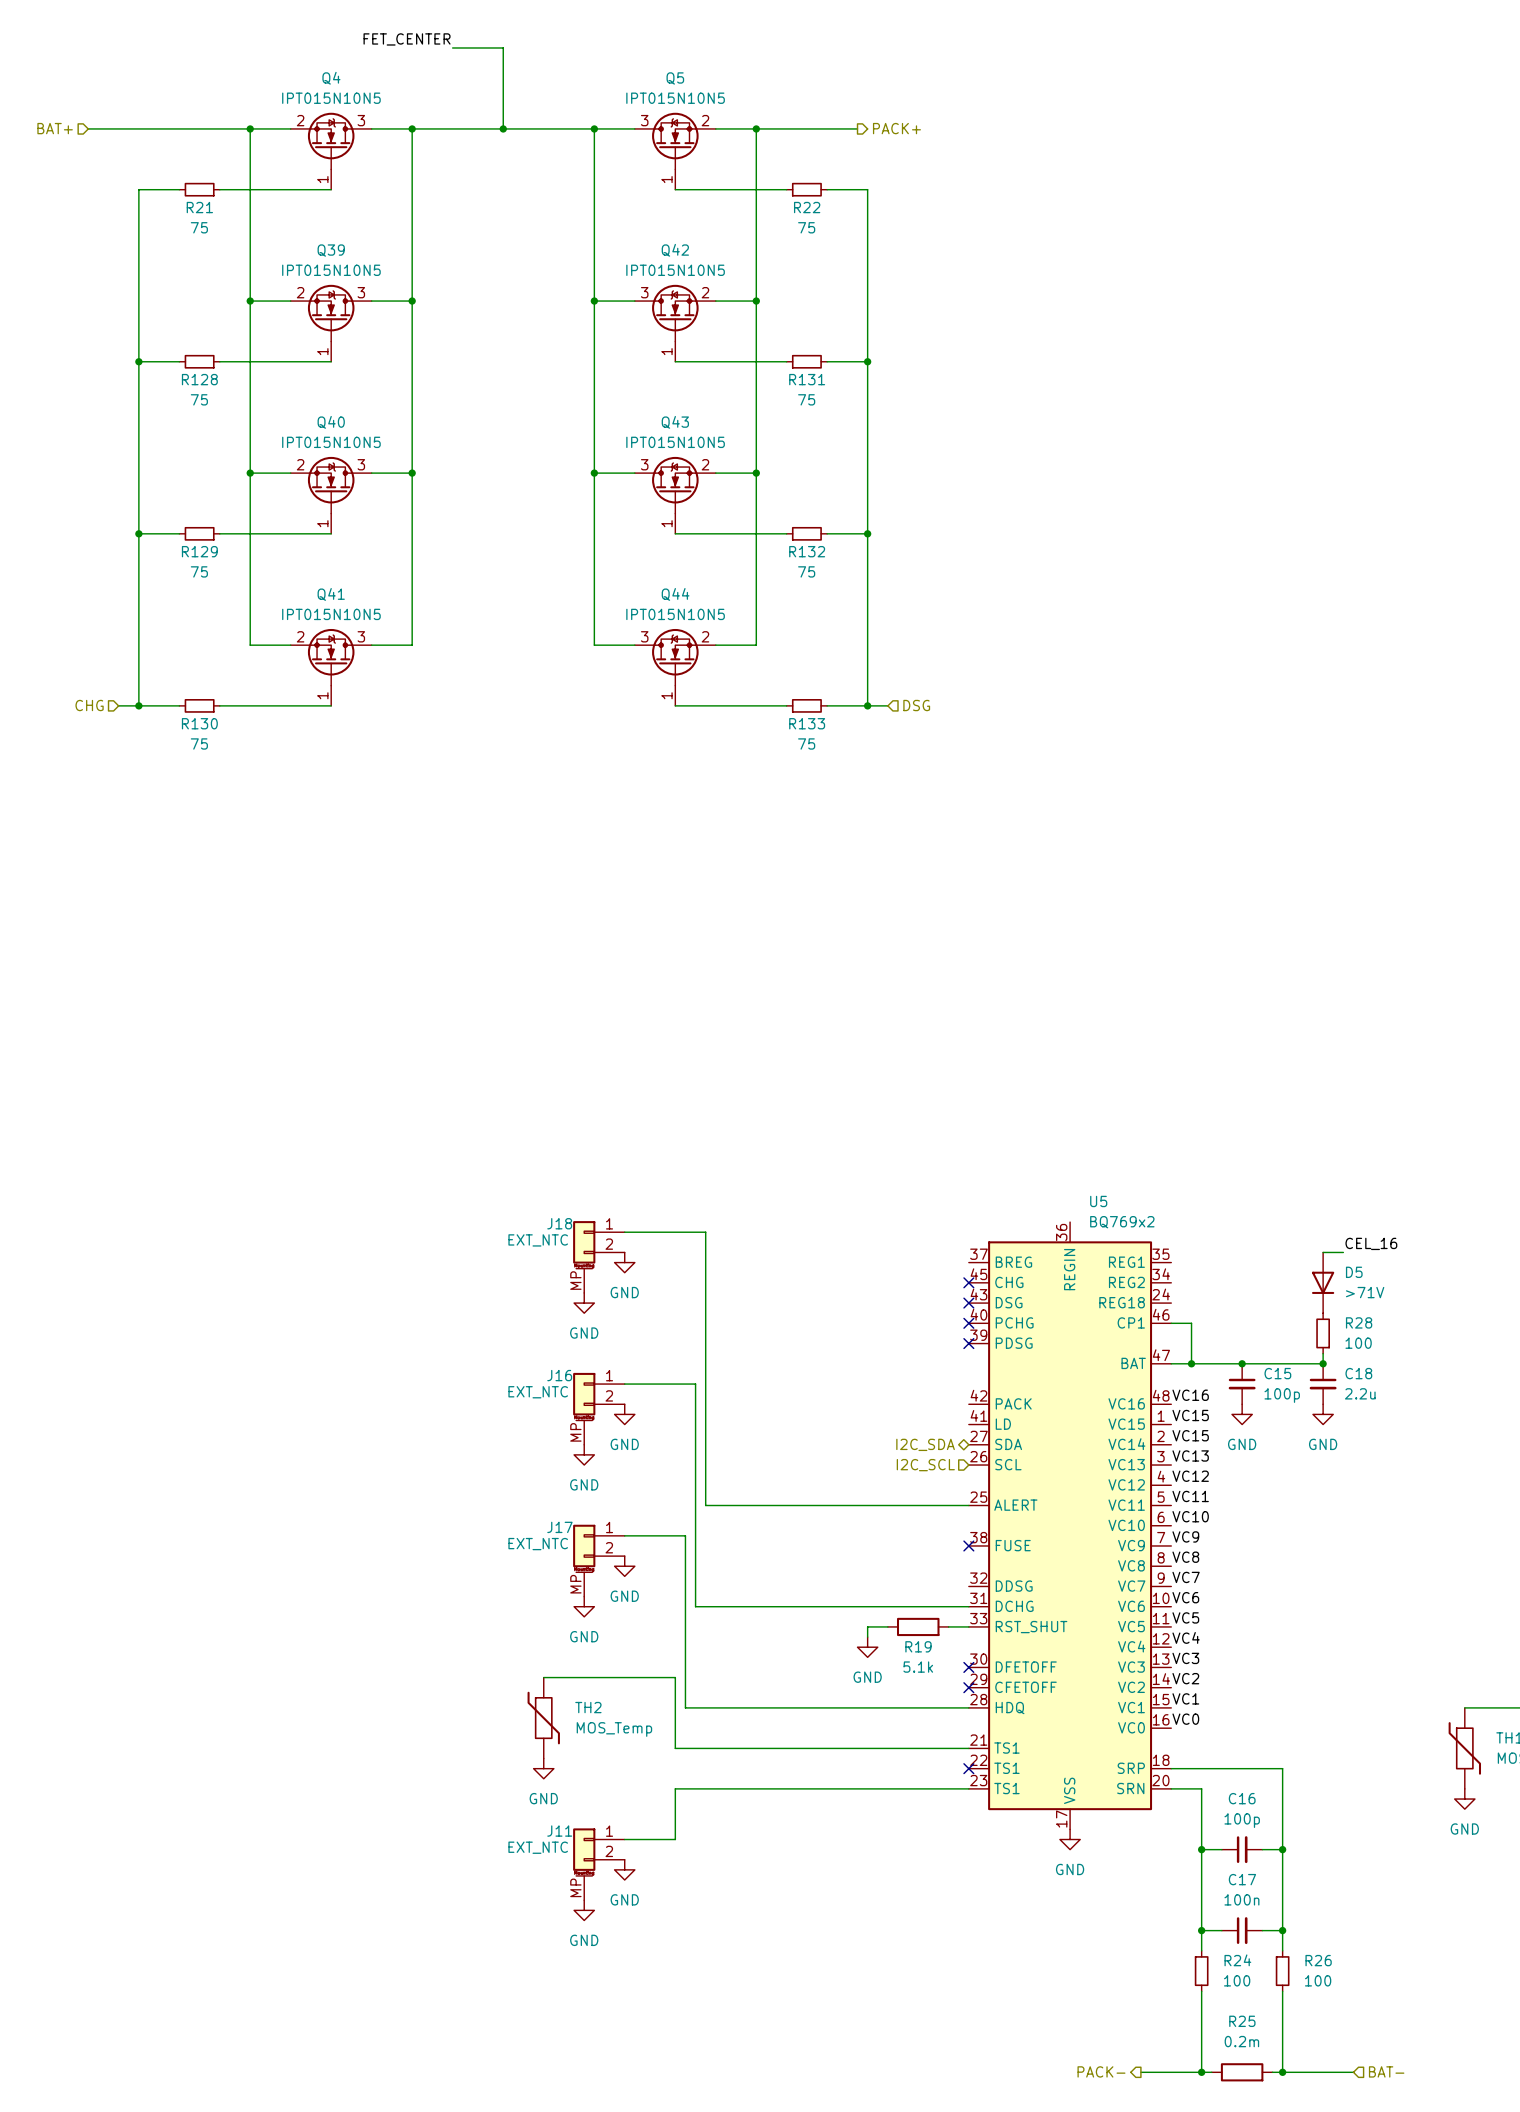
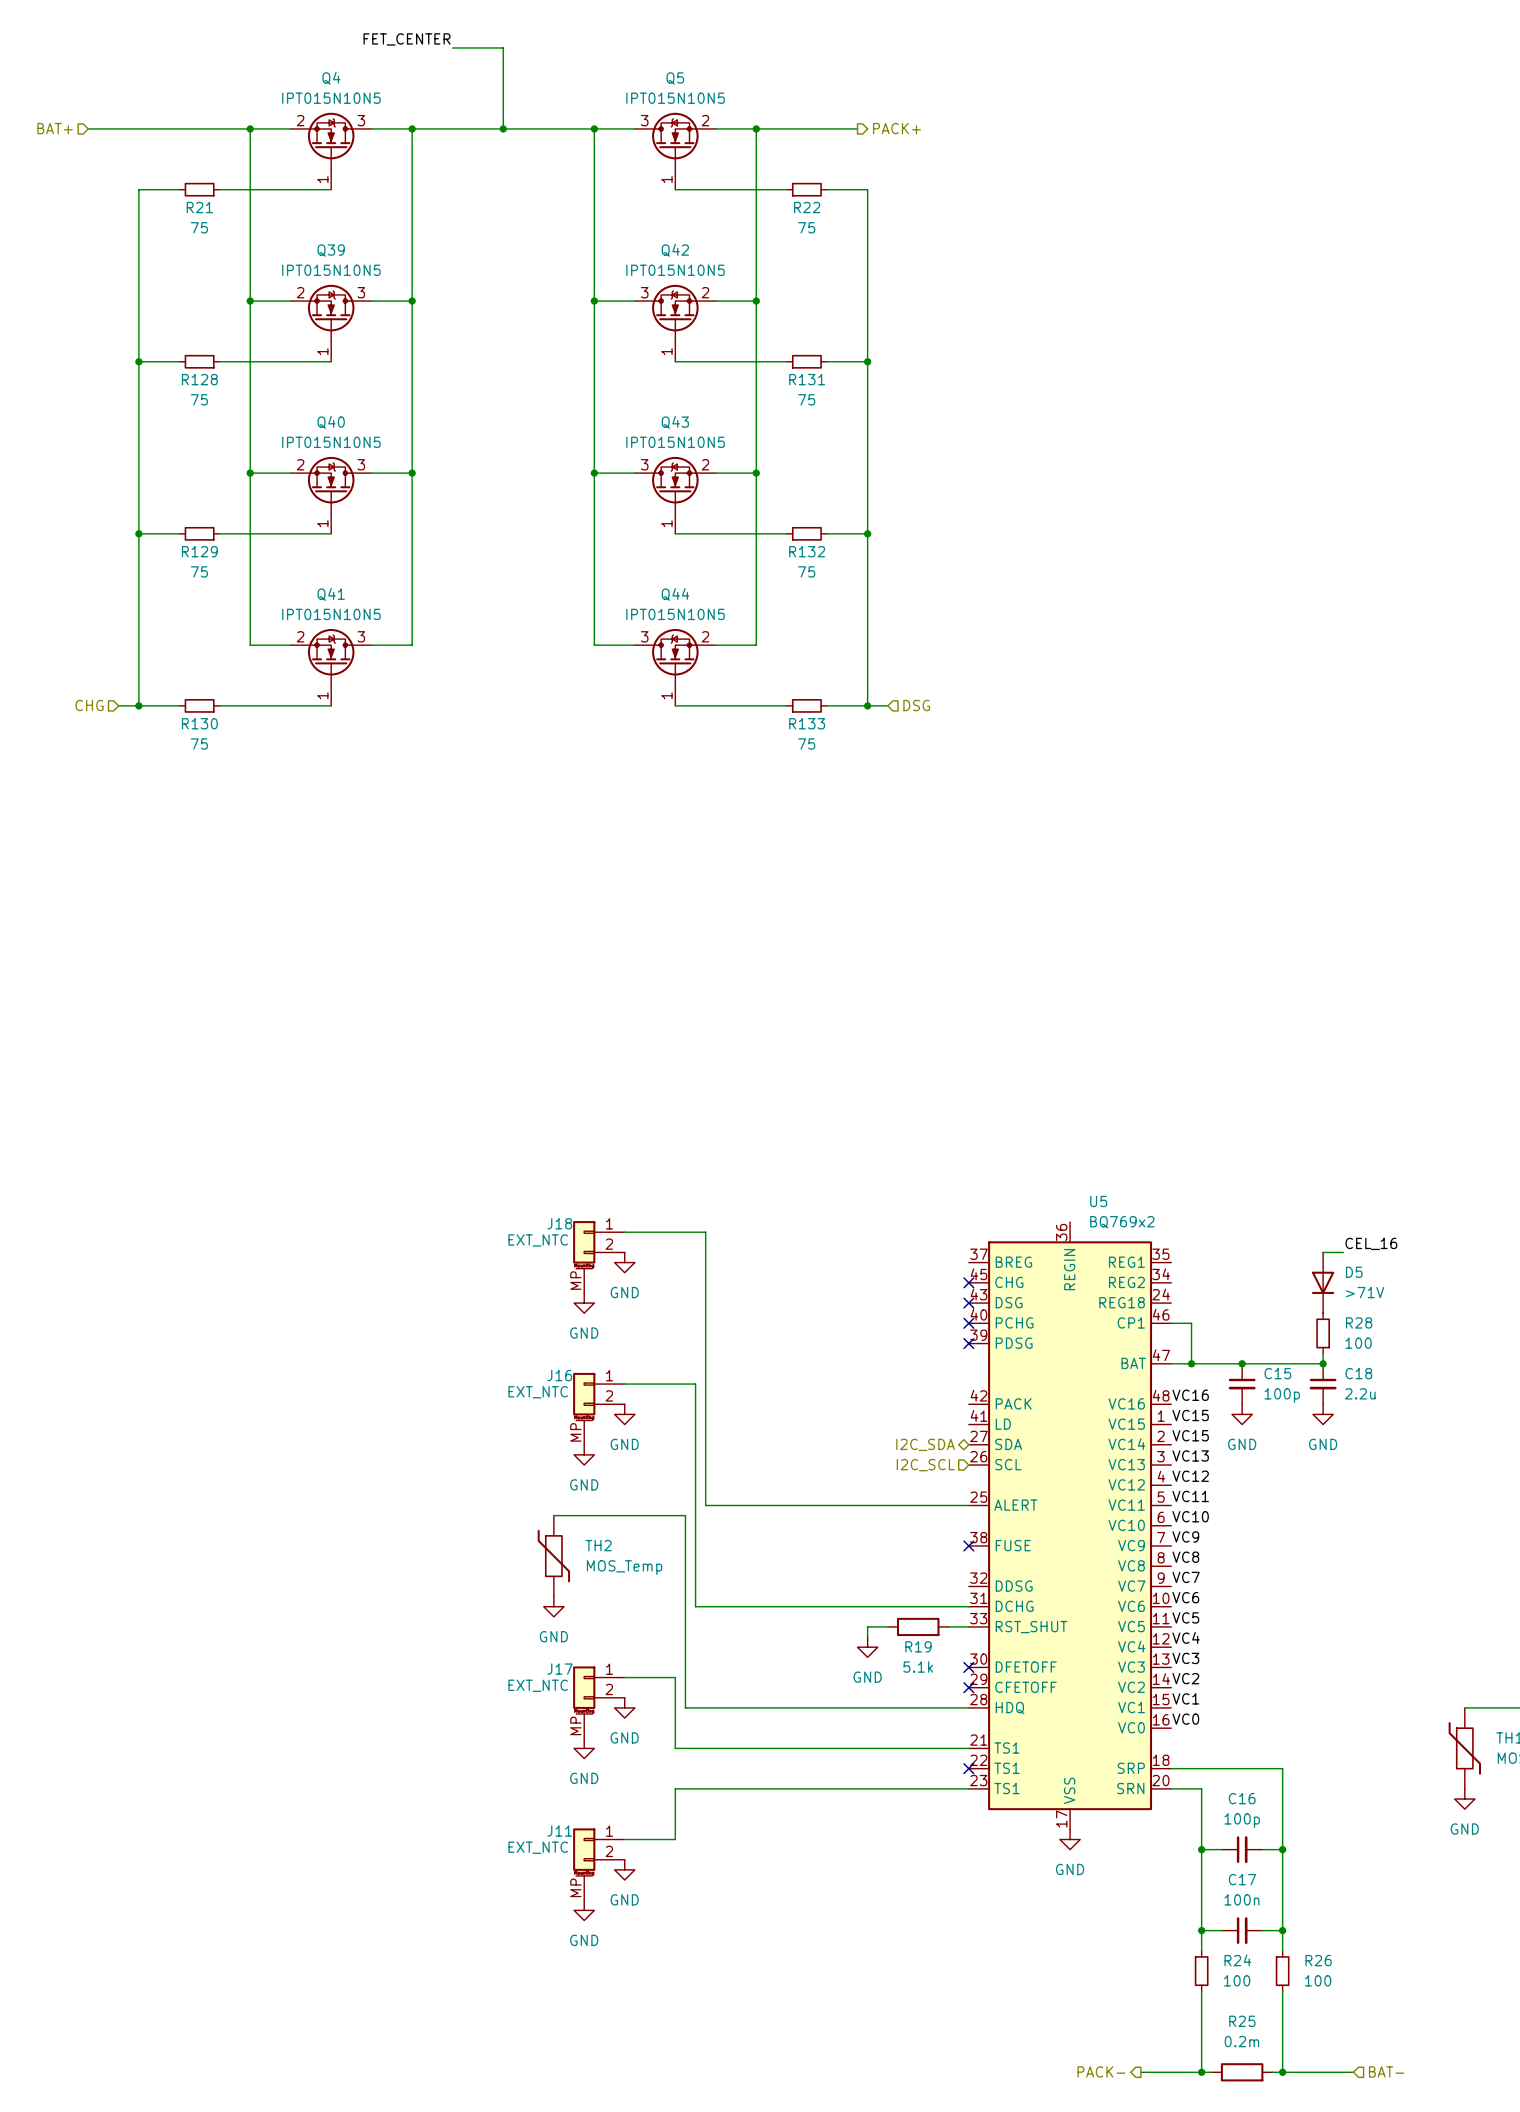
wire: (624, 1535) (685, 1535) -> (553, 1515) (685, 1515) (685, 1535)
J17 position: (598, 1560) -> (598, 1702)
power symbol: GND (624, 1566) -> none
power symbol position: GND (584, 1606) -> GND (553, 1606)
power symbol: none -> GND (624, 1707)
TH2 position: (543, 1718) -> (553, 1556)
power symbol position: GND (543, 1768) -> GND (584, 1748)

